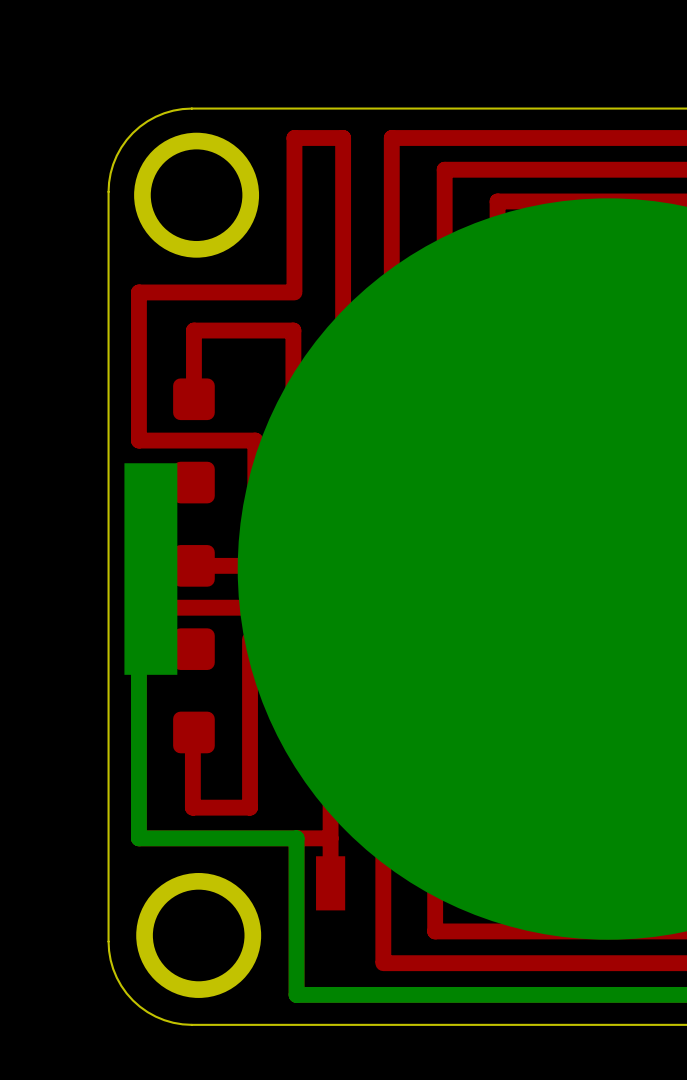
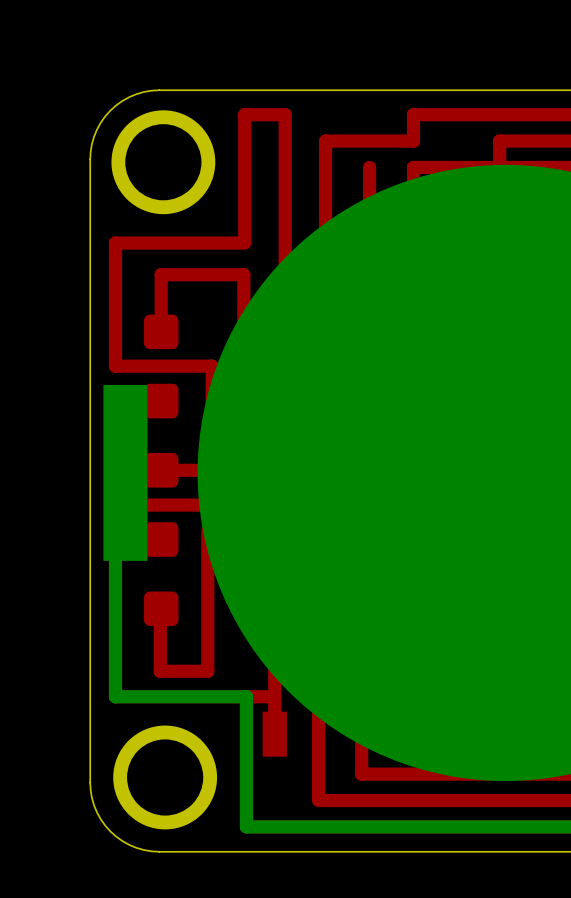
top track: (497, 137) (391, 137) (391, 169) -> (413, 114) (413, 141)
top track: (444, 169) (444, 201) -> (369, 141) (325, 141)
top track: (601, 169) (497, 169) -> (499, 141) (499, 167)

